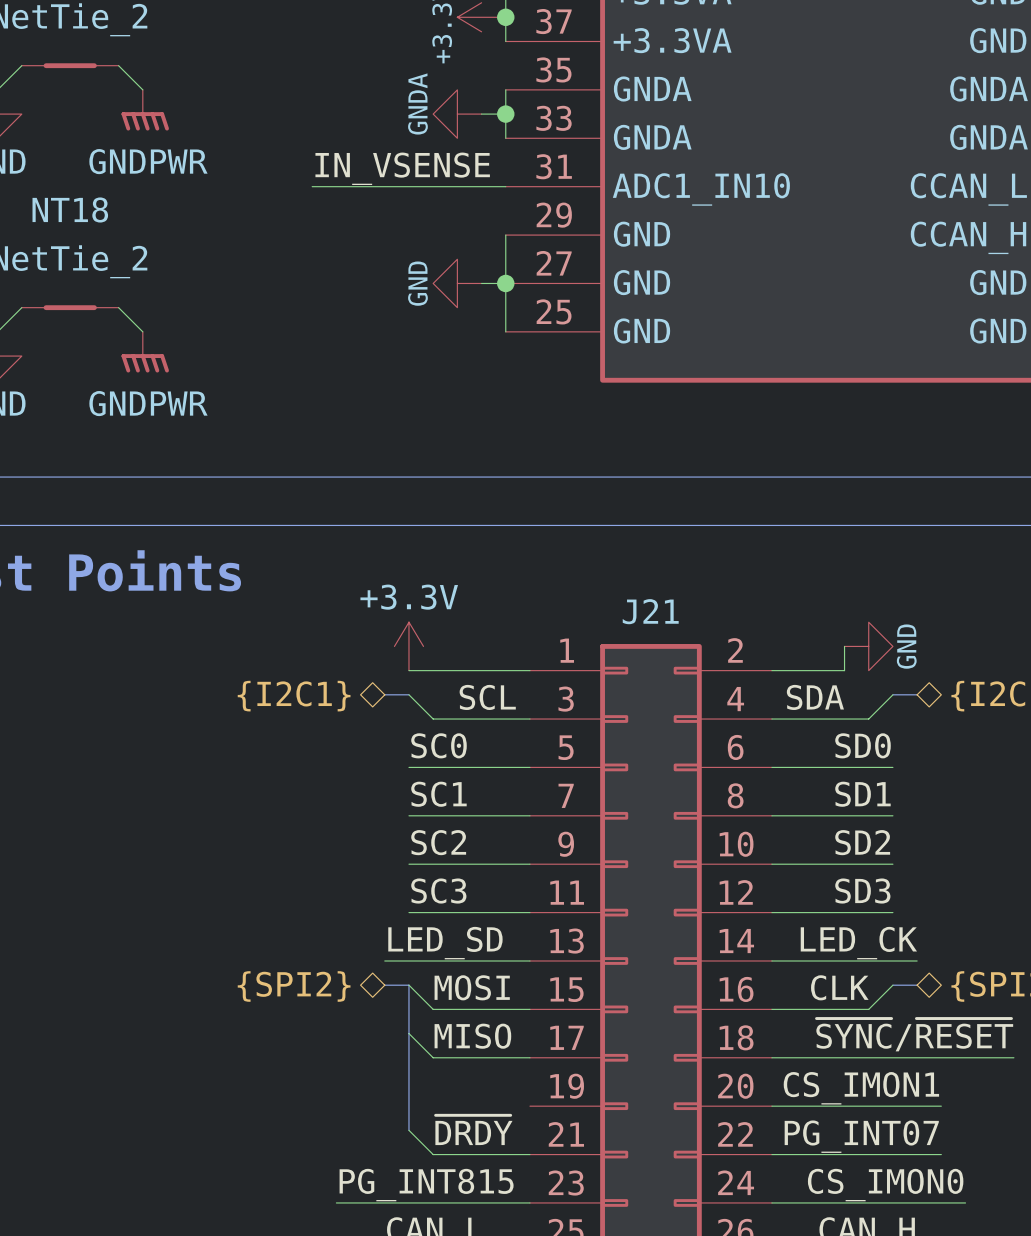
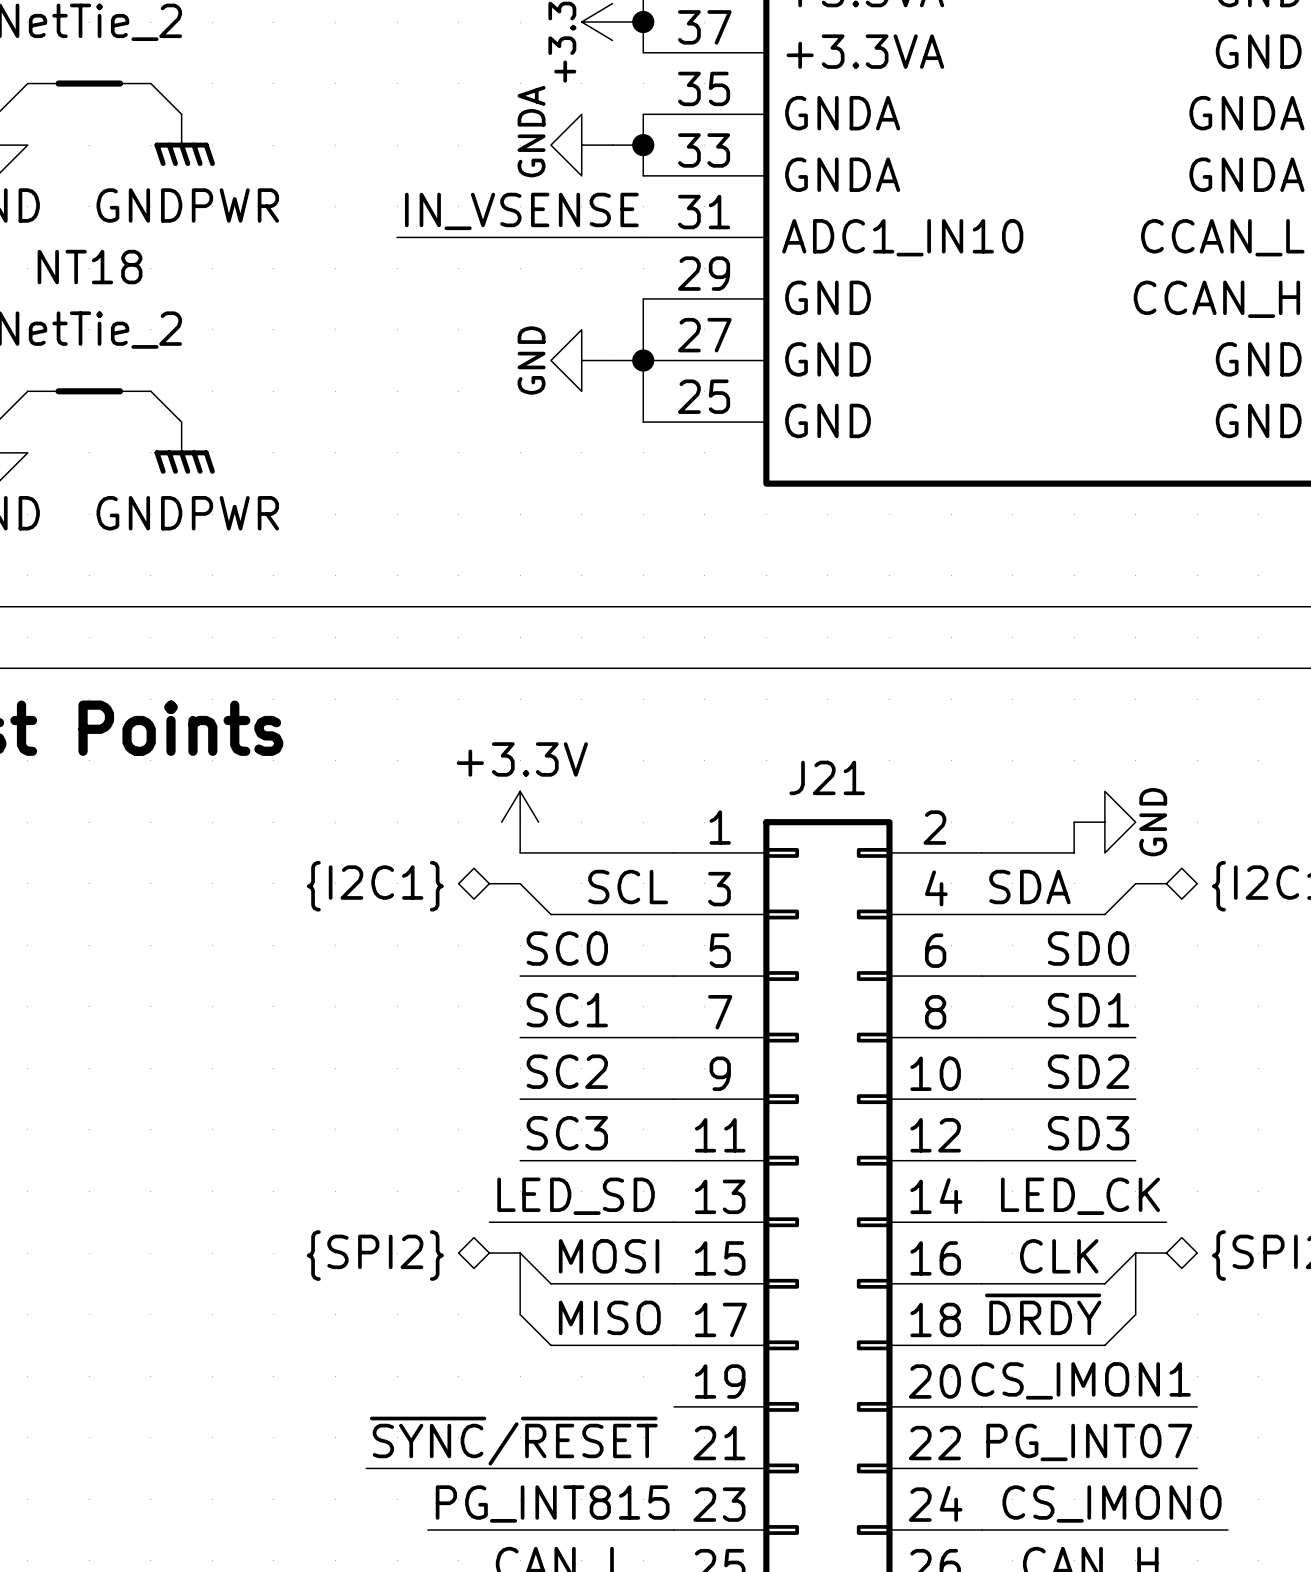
bus: none -> (1135, 1253) (1135, 1314)
bus: (408, 1033) (408, 1130) -> none
label: ~{SYNC}/~{RESET} (914, 1034) -> none
wire: (868, 1057) (1013, 1057) -> (1104, 1345) (1135, 1314)
wire: (408, 1130) (433, 1154) -> (366, 1468) (550, 1468)
label position: ~{DRDY} (473, 1130) -> ~{DRDY} (1043, 1314)
label: none -> ~{SYNC}/~{RESET} (513, 1441)

